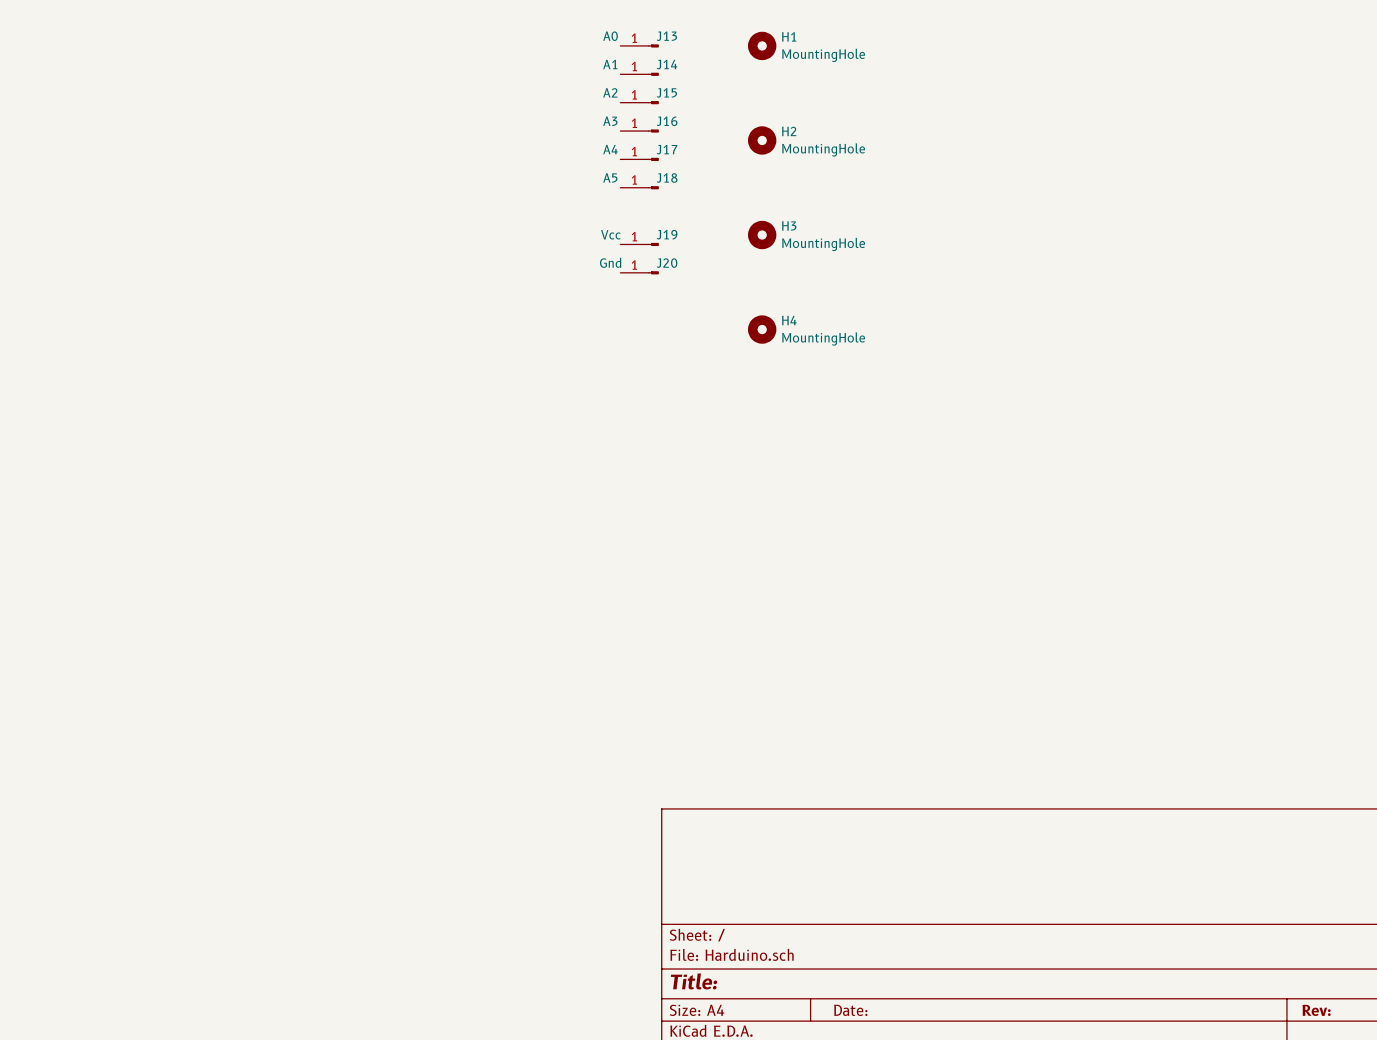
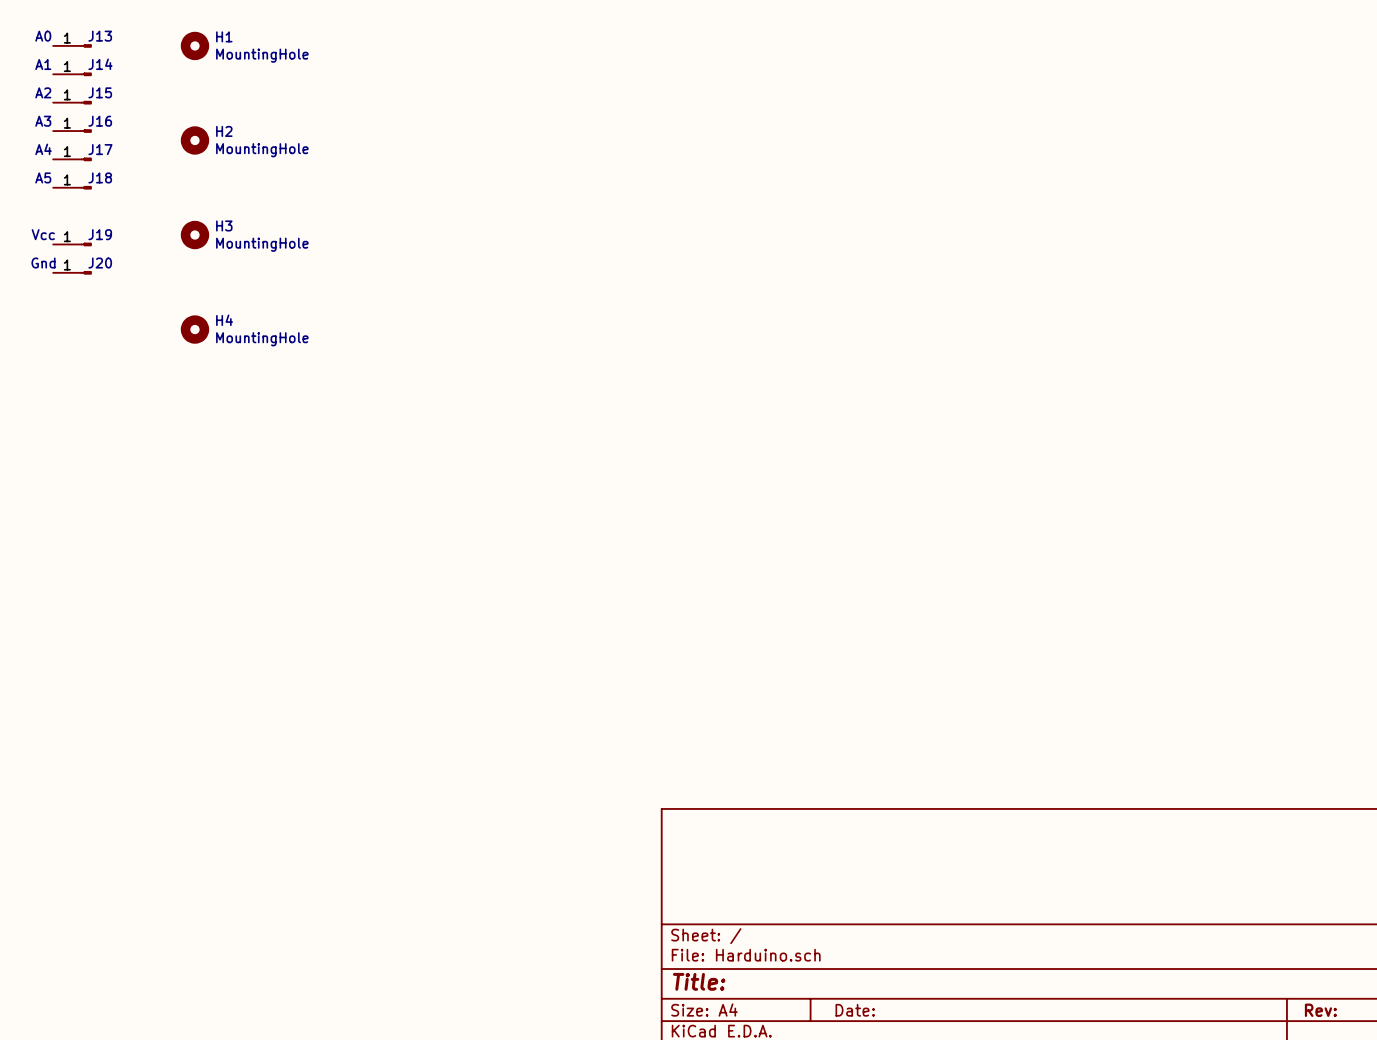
J13 position: (639, 45) -> (72, 45)
H1 position: (762, 45) -> (194, 45)
J14 position: (639, 74) -> (72, 74)
J15 position: (639, 102) -> (72, 102)
J16 position: (639, 131) -> (72, 131)
H2 position: (762, 140) -> (194, 140)
J17 position: (639, 159) -> (72, 159)
J18 position: (639, 187) -> (72, 187)
H3 position: (762, 235) -> (194, 235)
J19 position: (639, 244) -> (72, 244)
J20 position: (639, 272) -> (72, 272)
H4 position: (762, 329) -> (194, 329)

